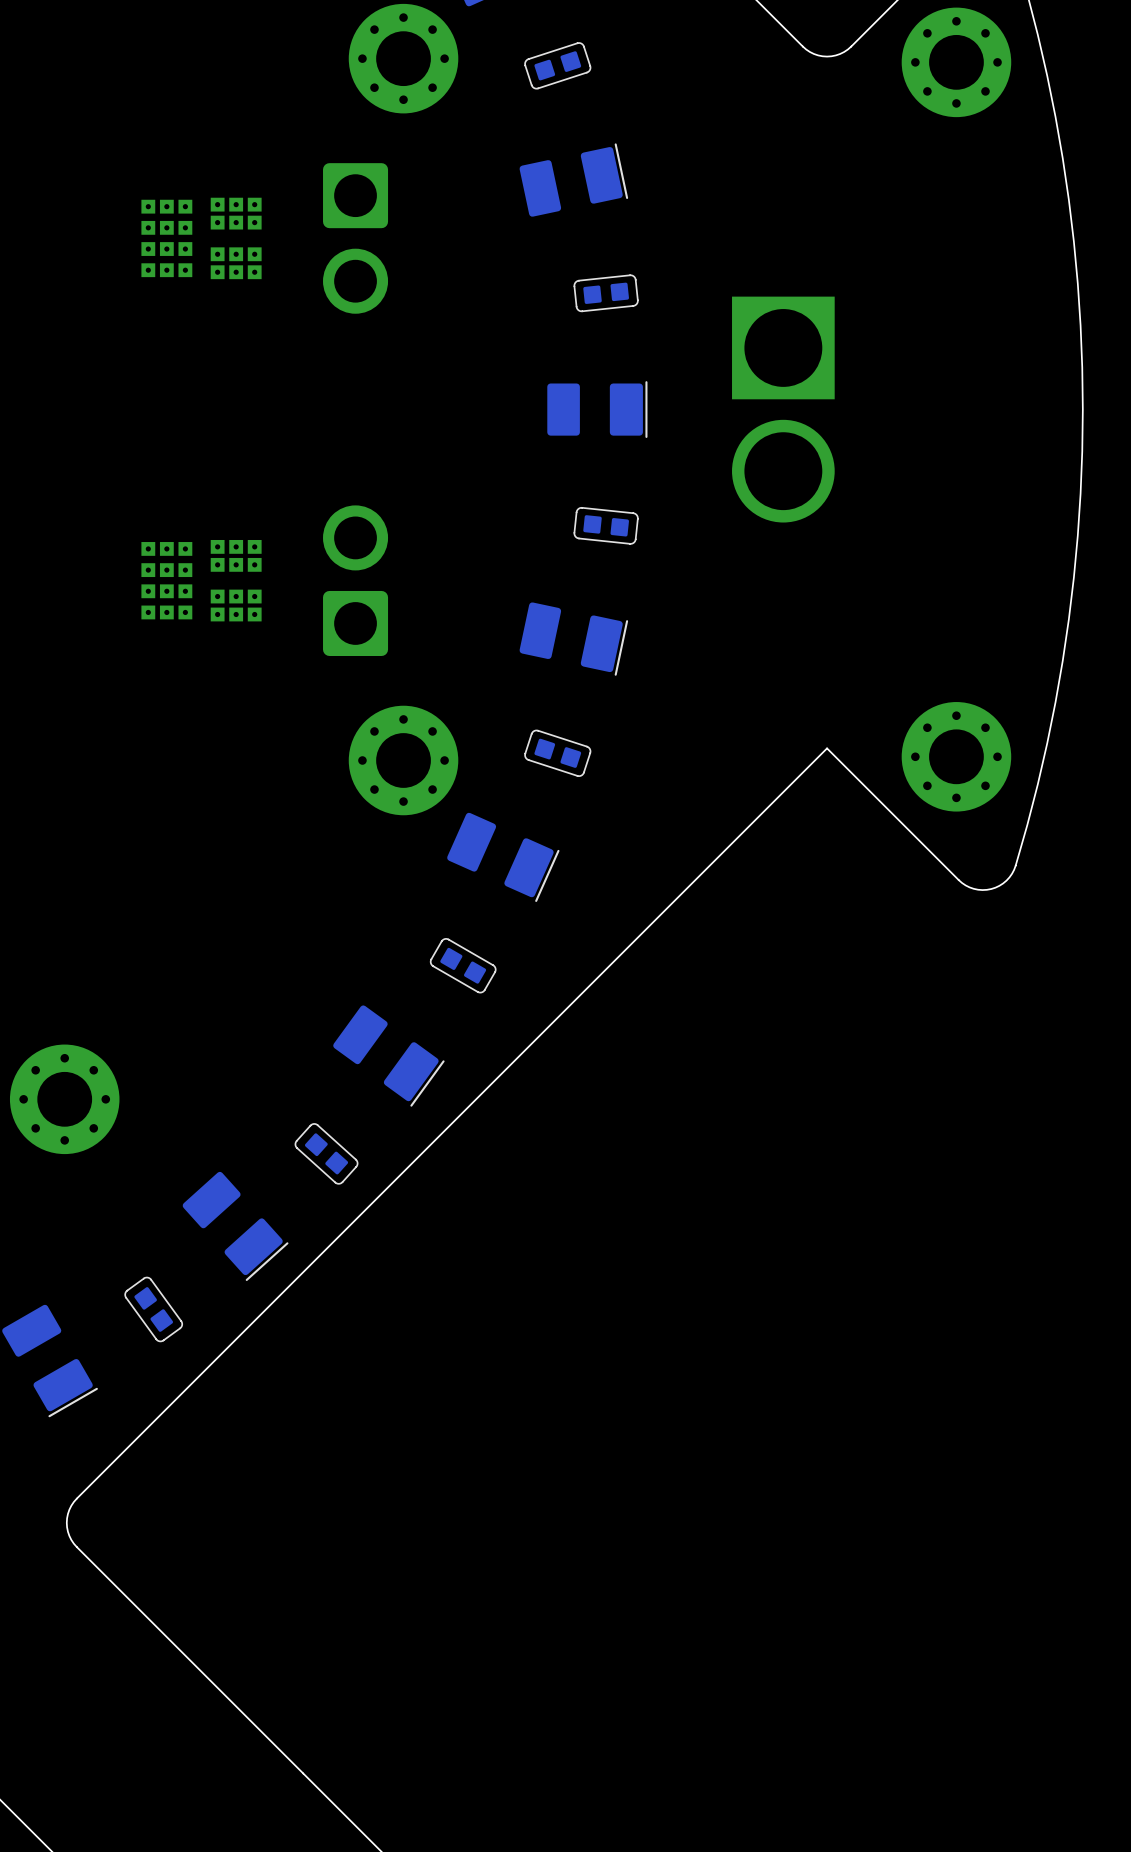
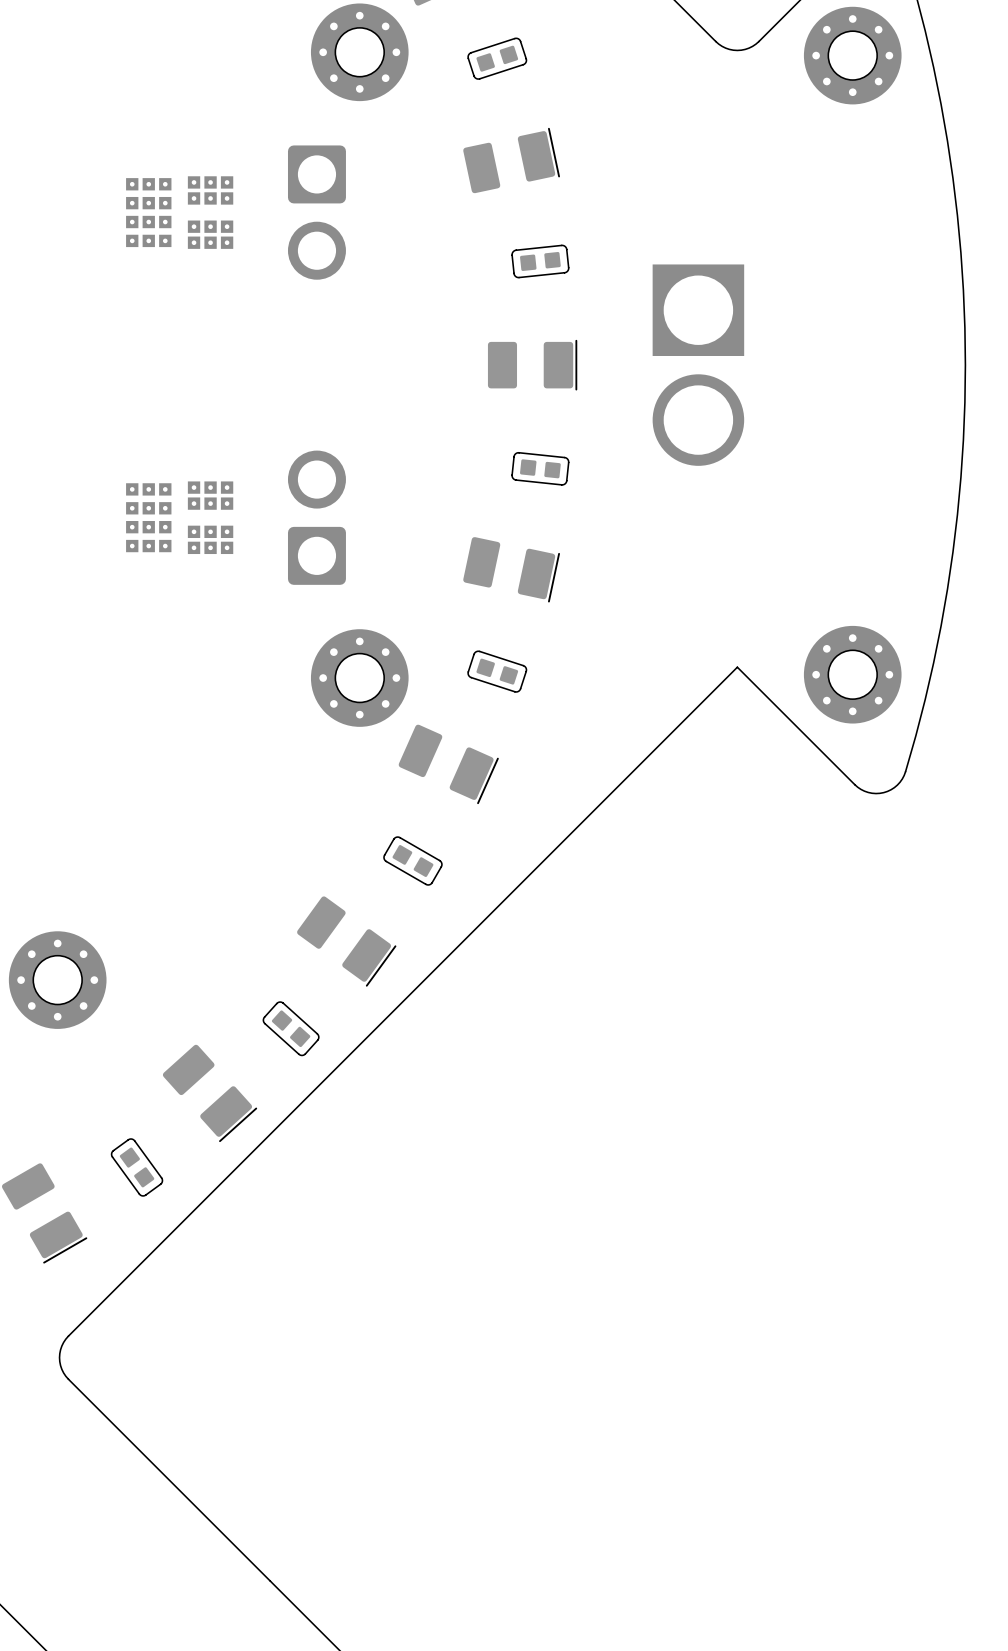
round board edge: none -> [334, 27, 385, 78]
round board edge: none -> [827, 30, 878, 81]
round board edge: none -> [827, 649, 878, 700]
round board edge: none -> [334, 652, 385, 704]
round board edge: none -> [32, 954, 83, 1006]

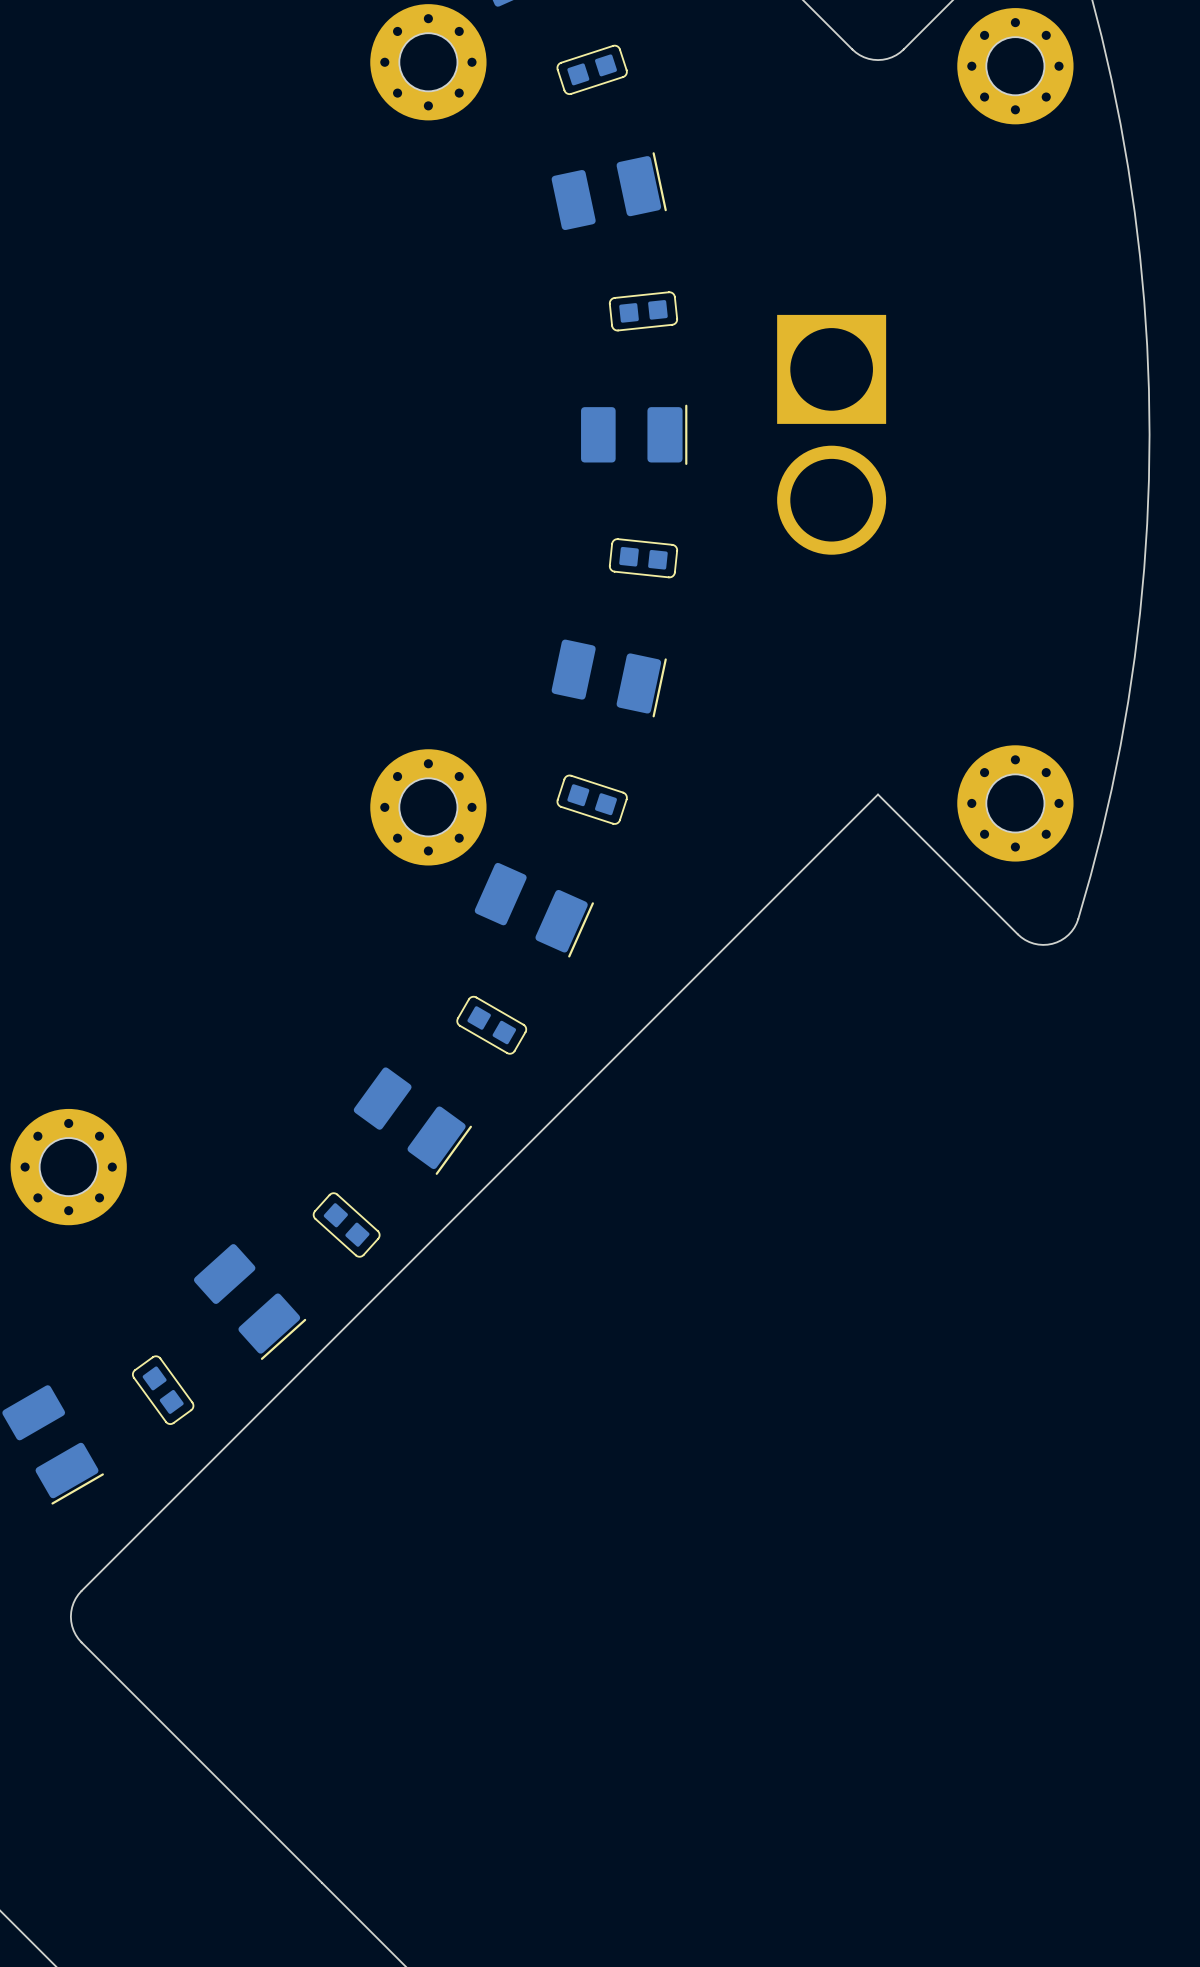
part: (179, 212) -> none
part: (316, 212) -> none
part: (179, 517) -> none
part: (316, 517) -> none

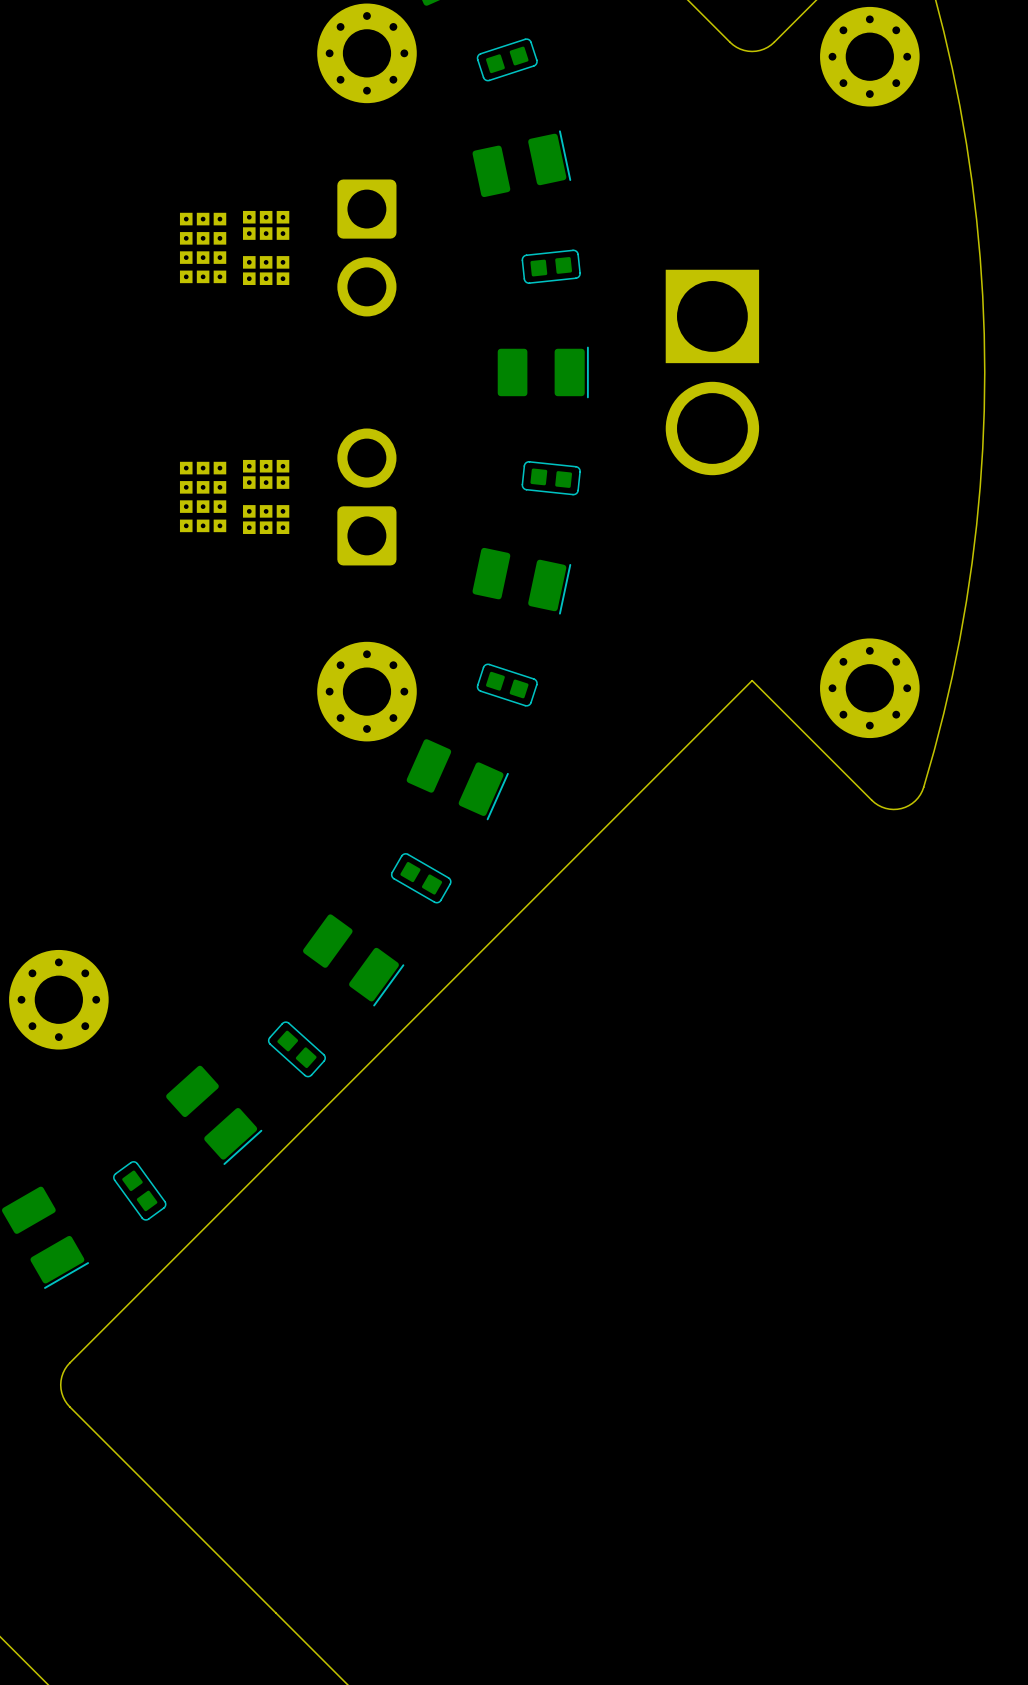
part: none -> (234, 247)
part: none -> (366, 247)
part: none -> (234, 496)
part: none -> (366, 496)

